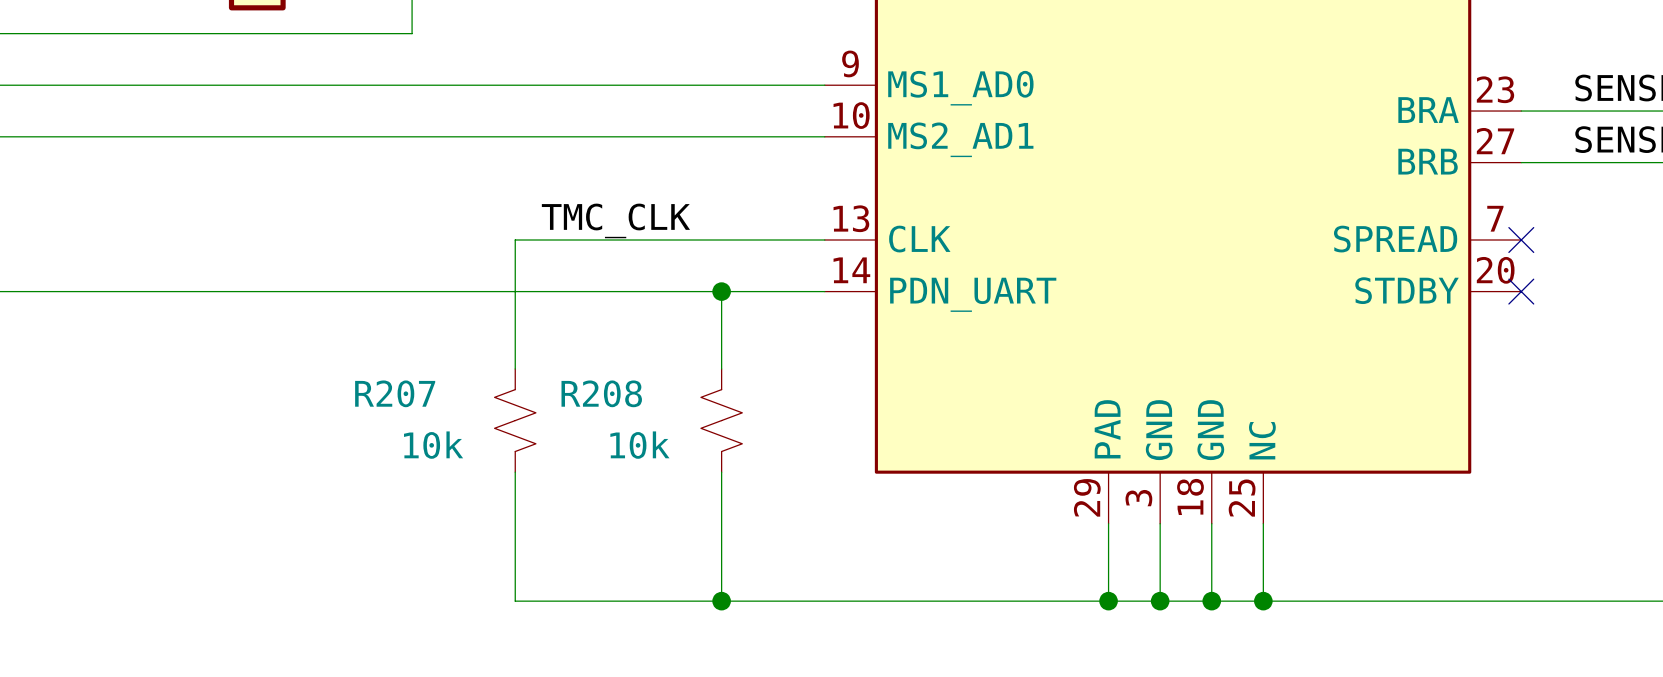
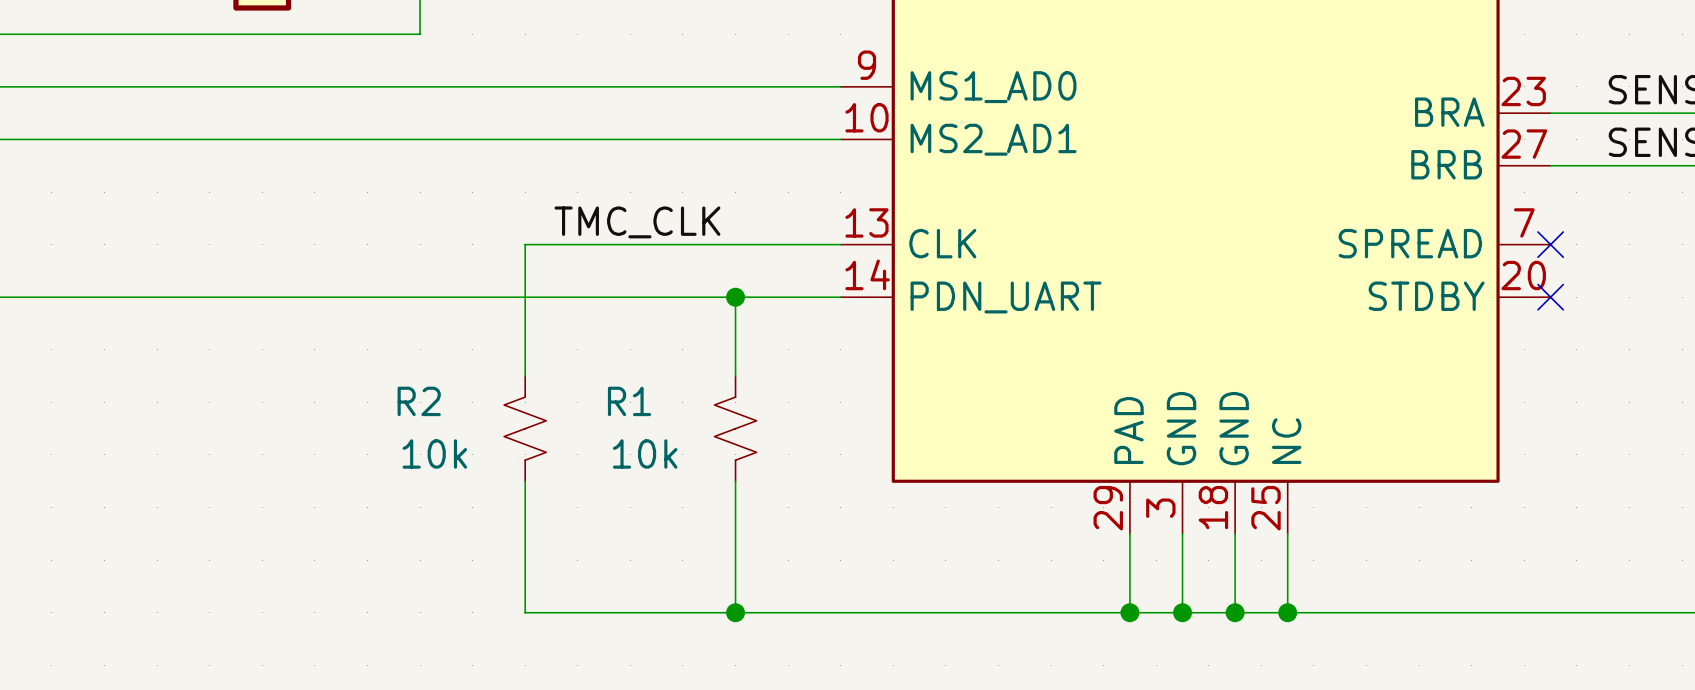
R207 name: R207 (395, 393) -> R2 (419, 401)
R208 name: R208 (601, 393) -> R1 (629, 401)

